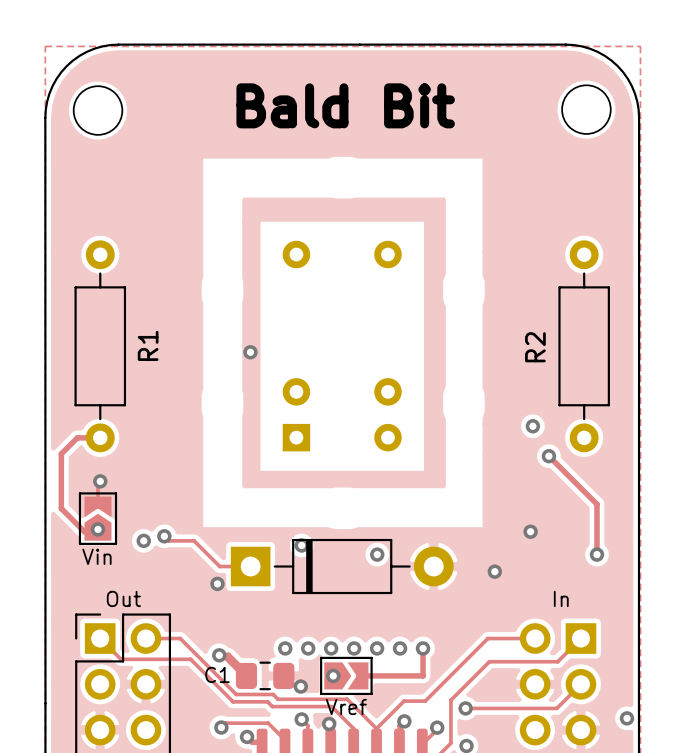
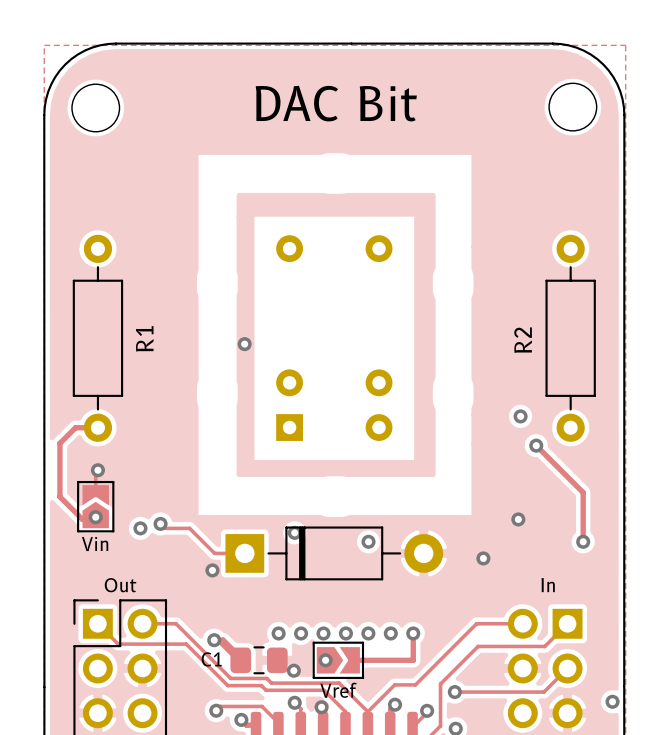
text: Bald Bit (345, 105) -> DAC Bit (336, 103)

